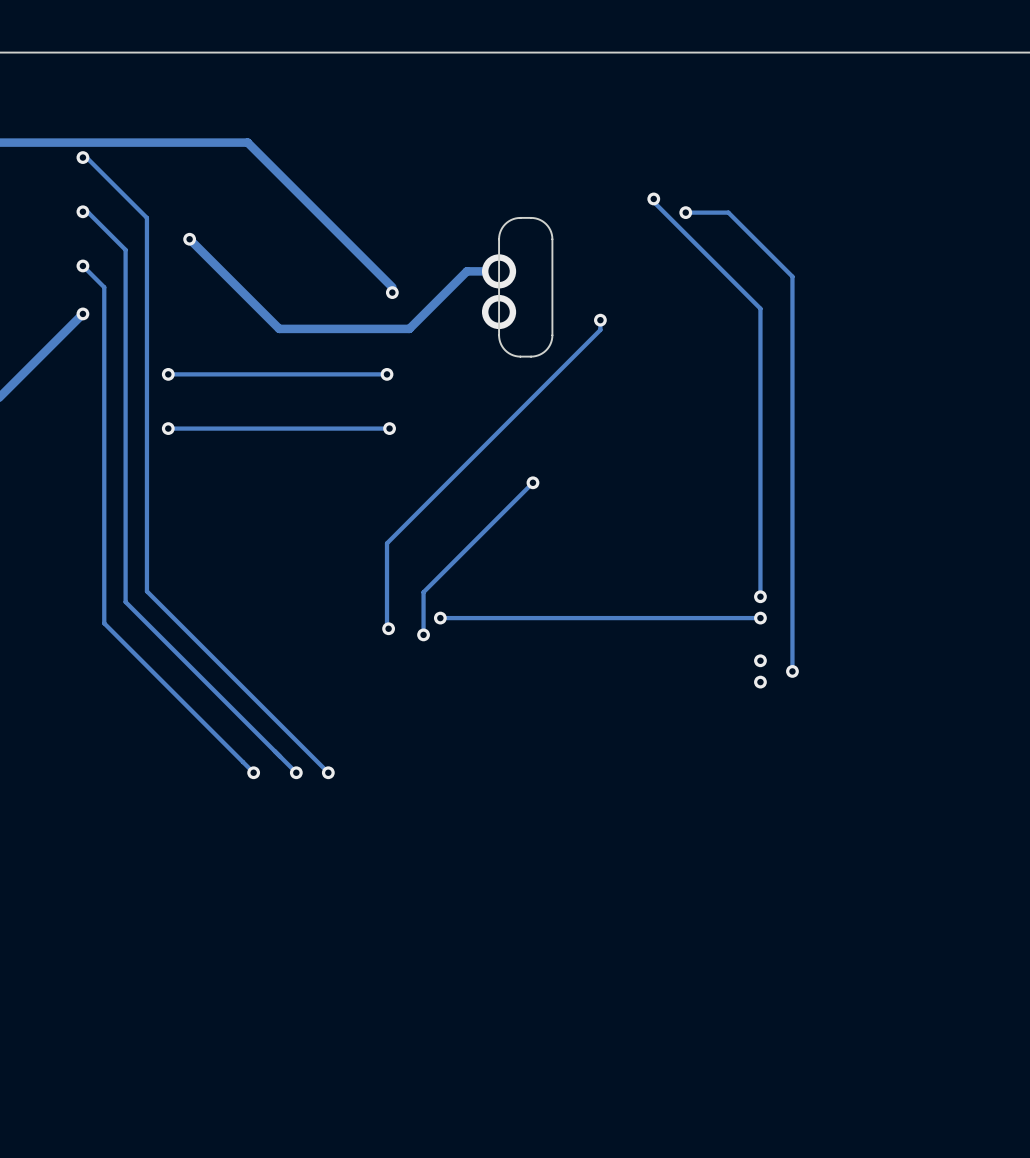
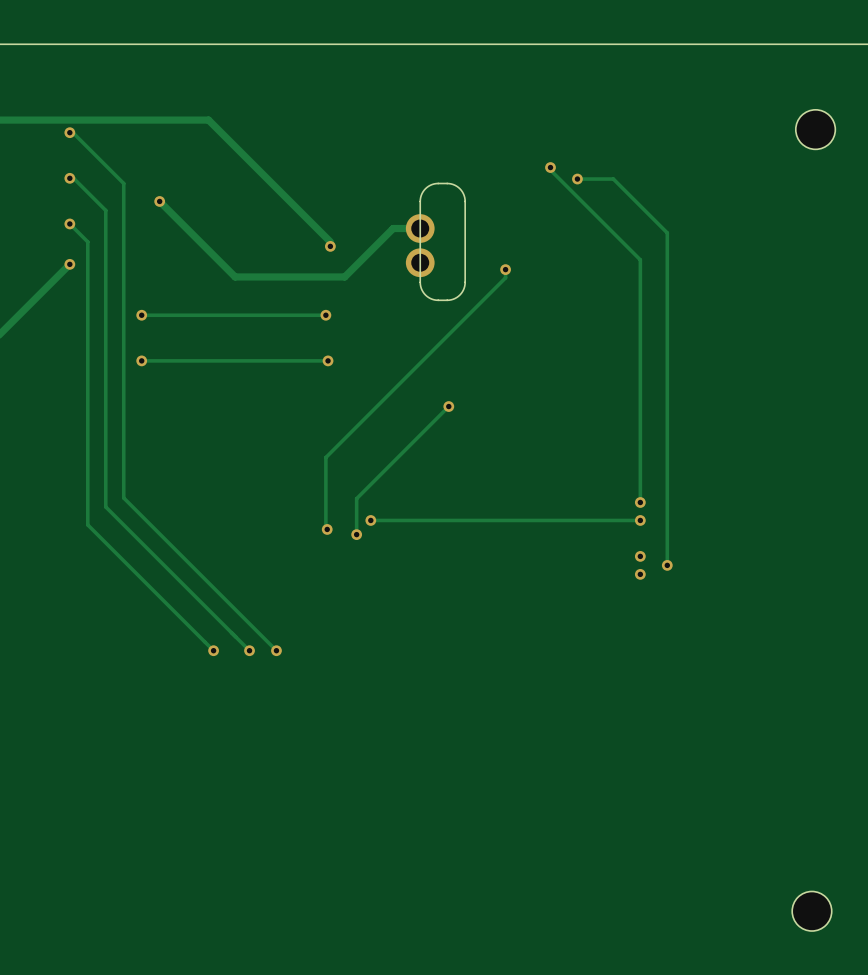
part: none -> (815, 129)
part: none -> (811, 911)

